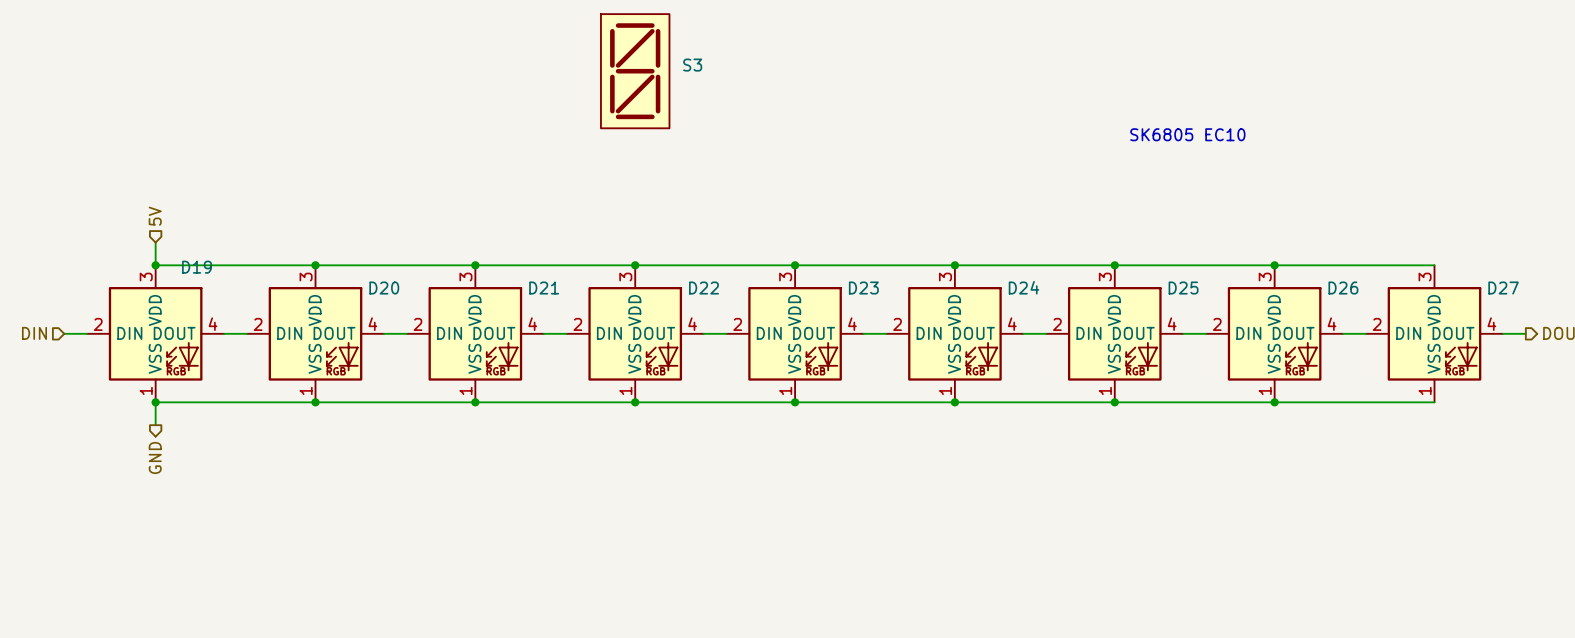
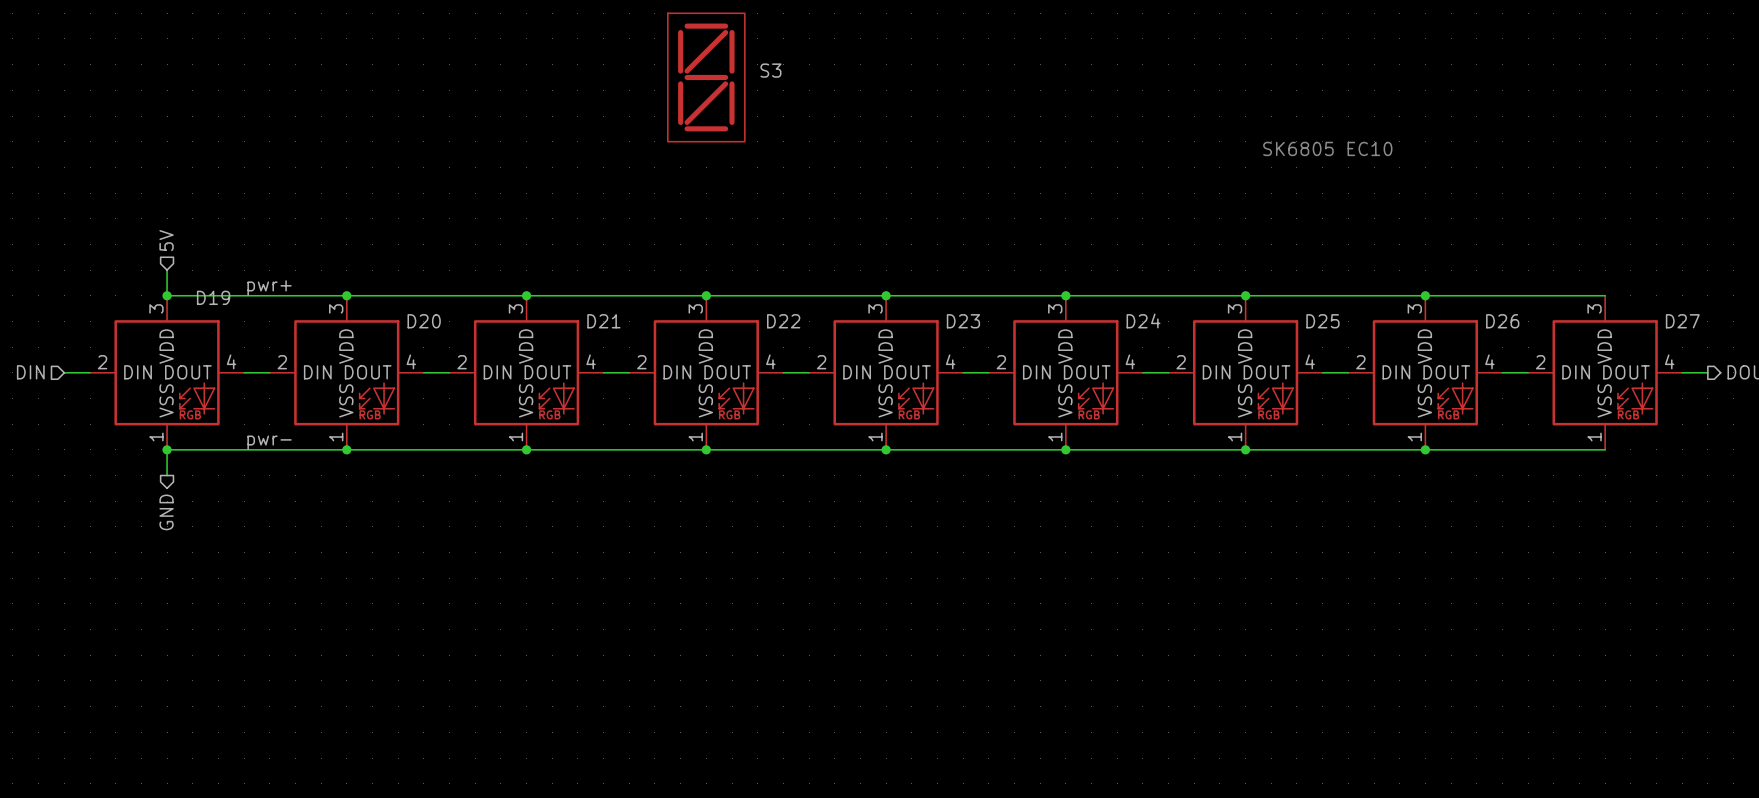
label: none -> pwr+ (269, 287)
label: none -> pwr- (269, 442)

